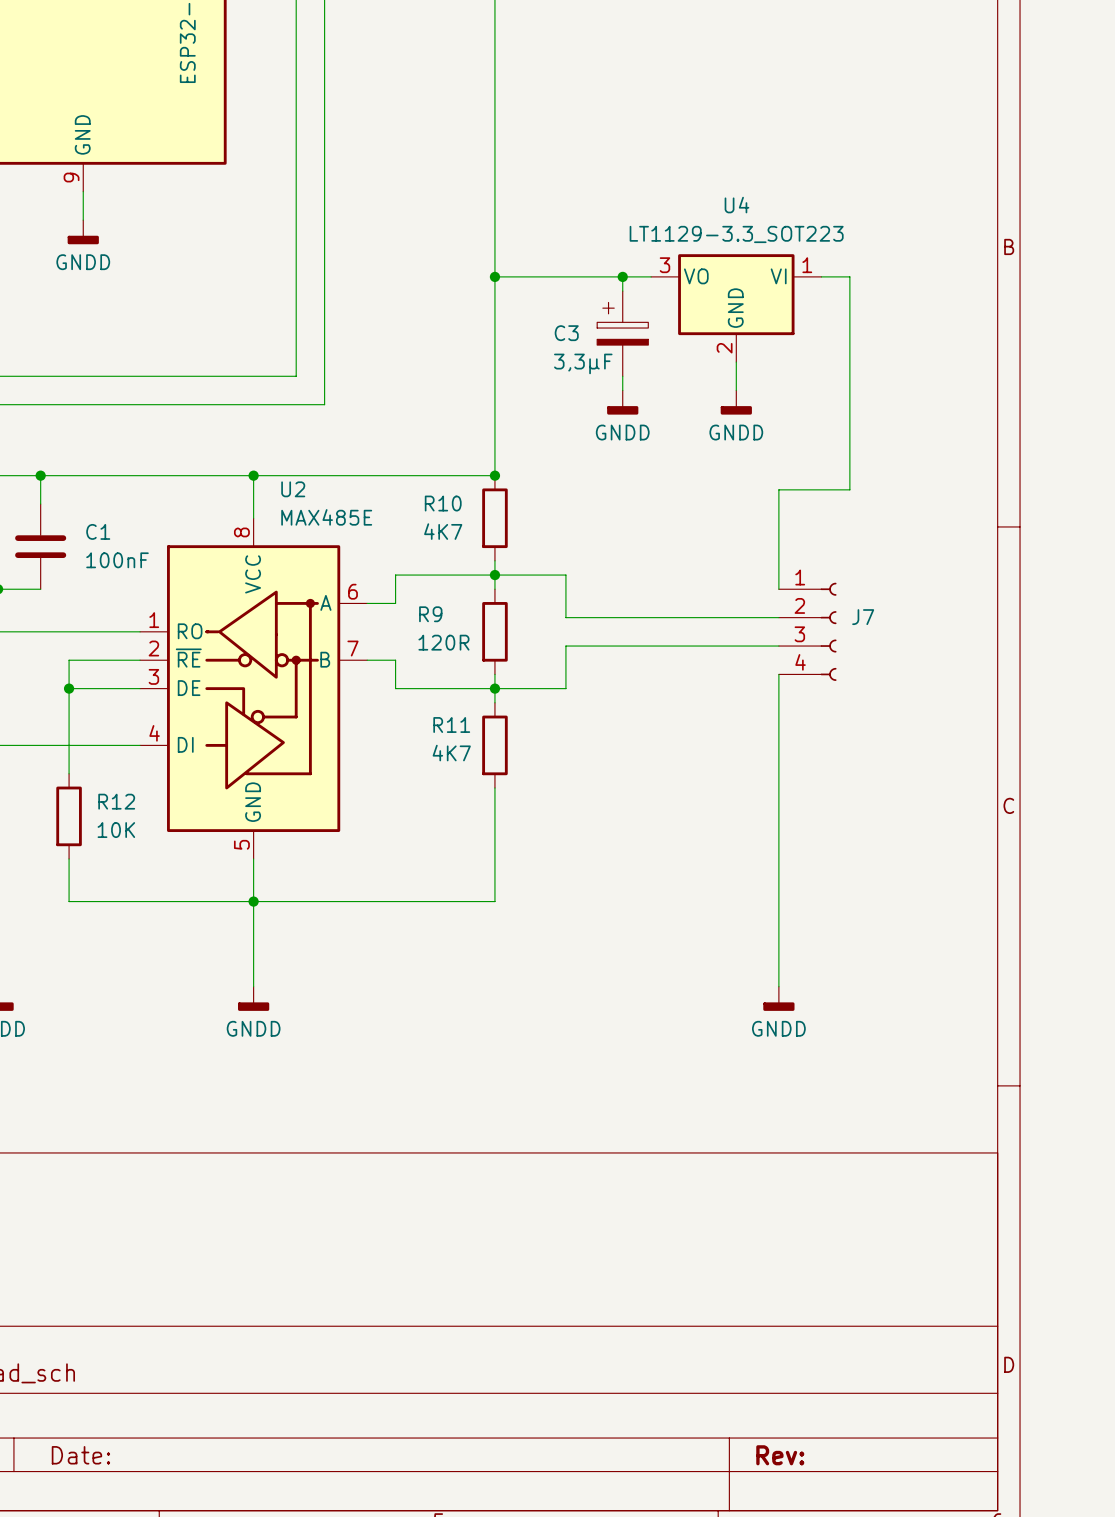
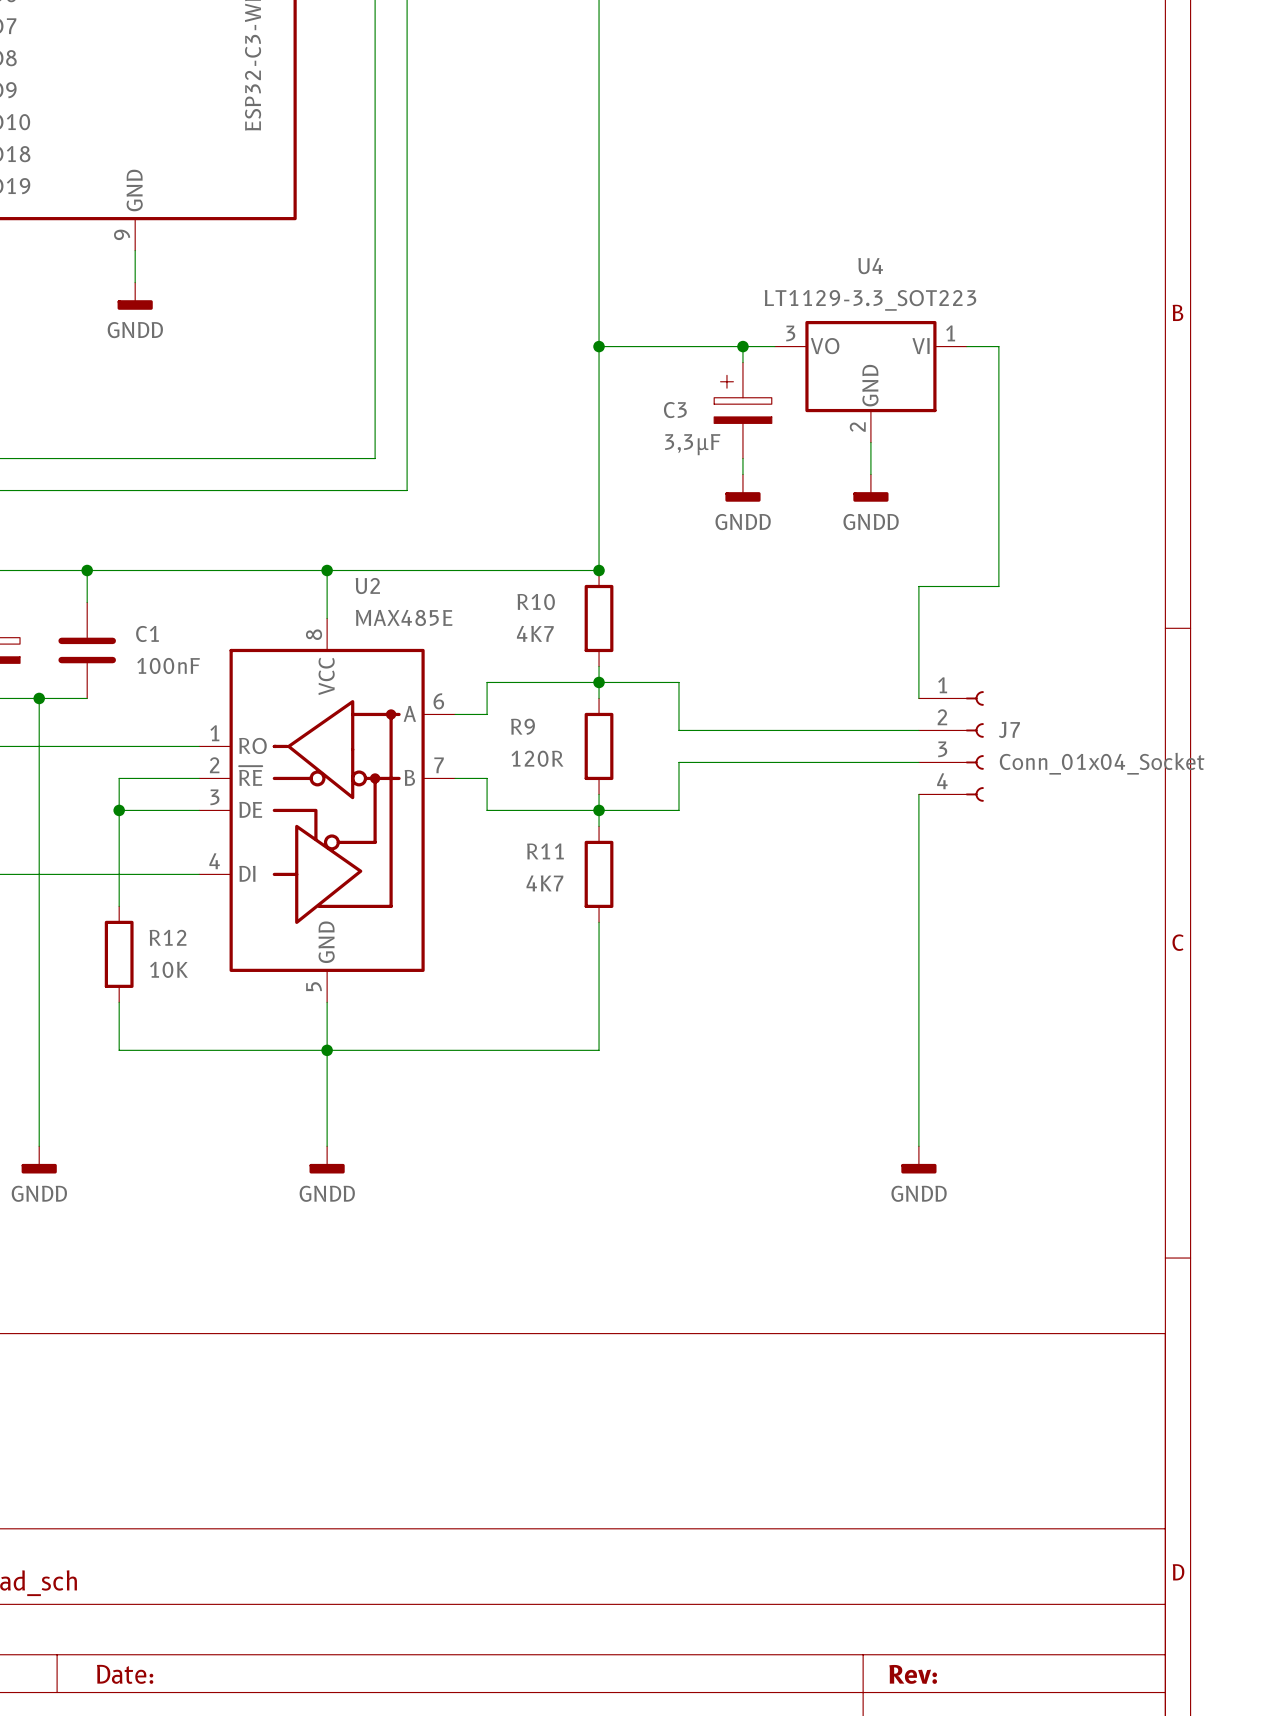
J7 value: none -> Conn_01x04_Socket (1102, 763)

